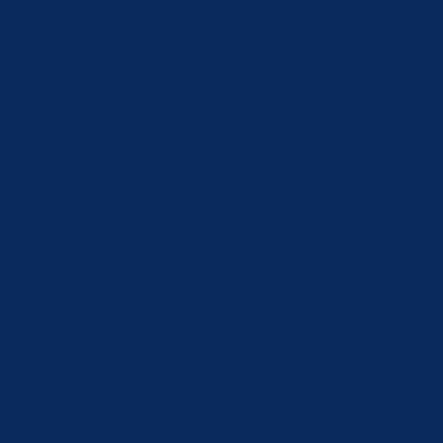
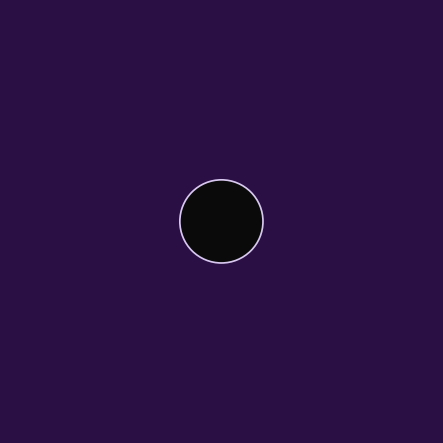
part: none -> (221, 221)

